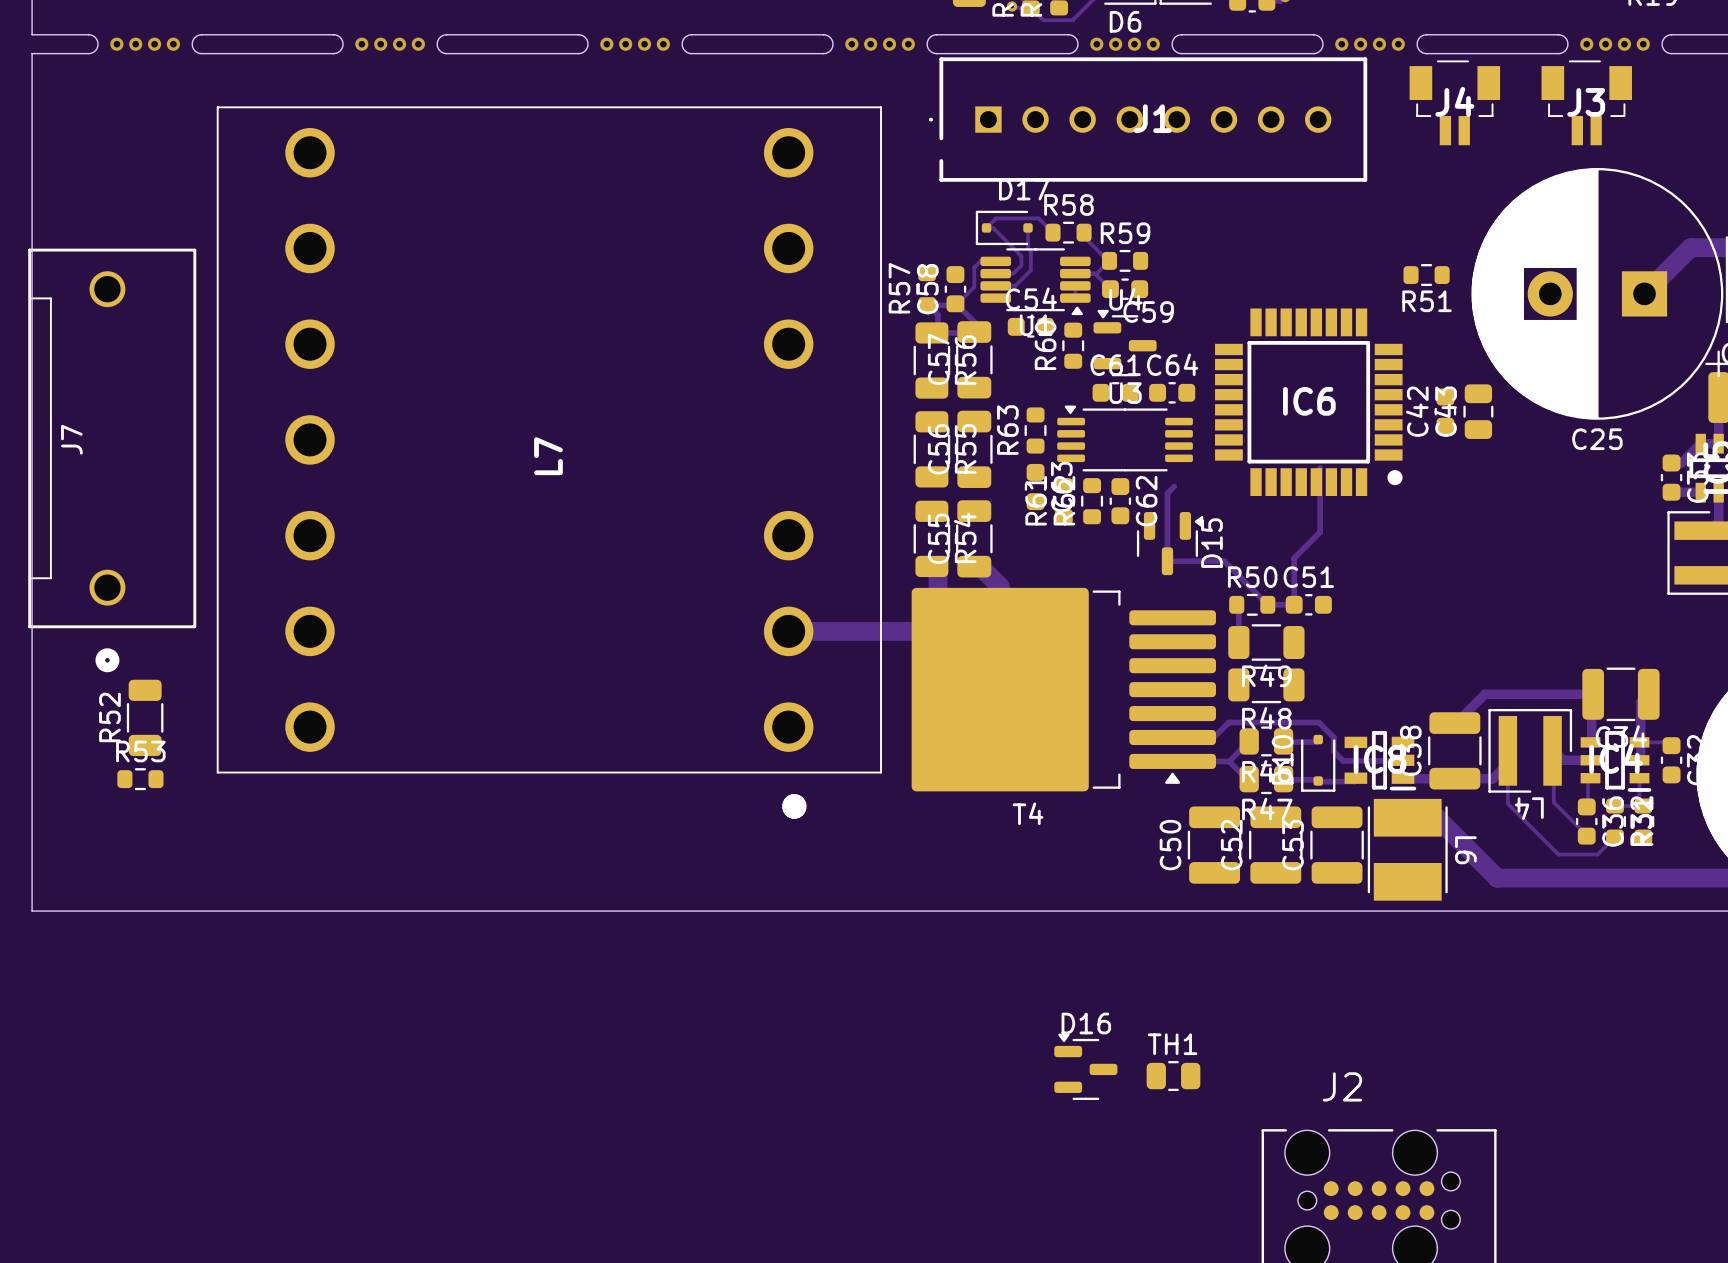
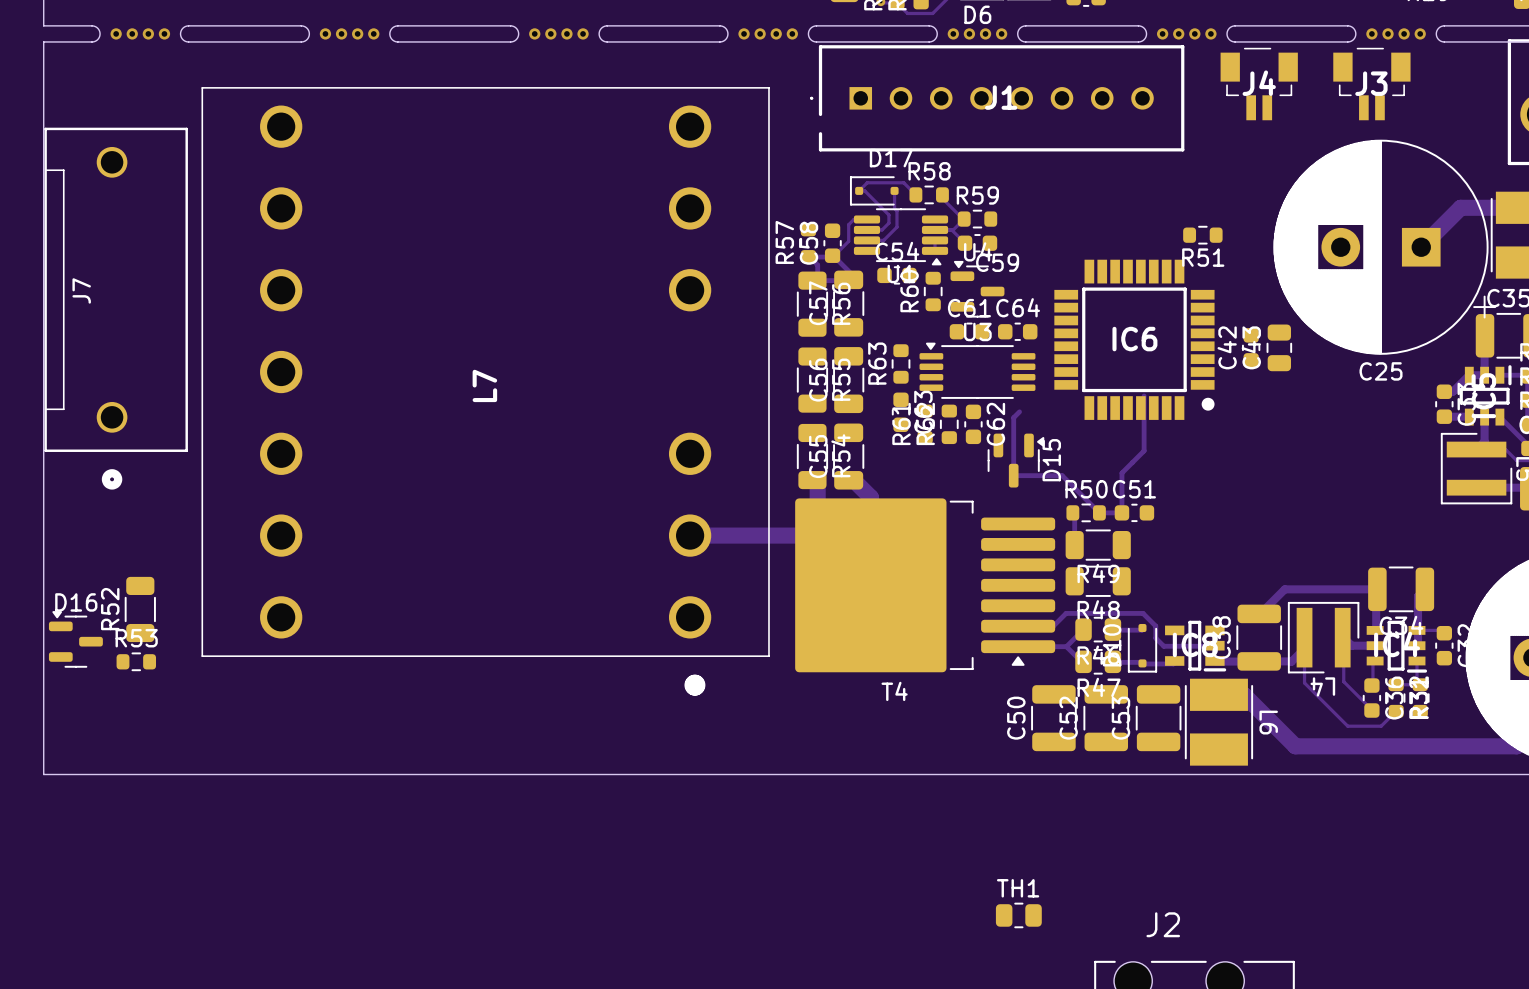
R51 position: (1426, 275) -> (1202, 235)
J7 position: (112, 460) -> (116, 308)
D16 position: (1085, 1066) -> (75, 639)

